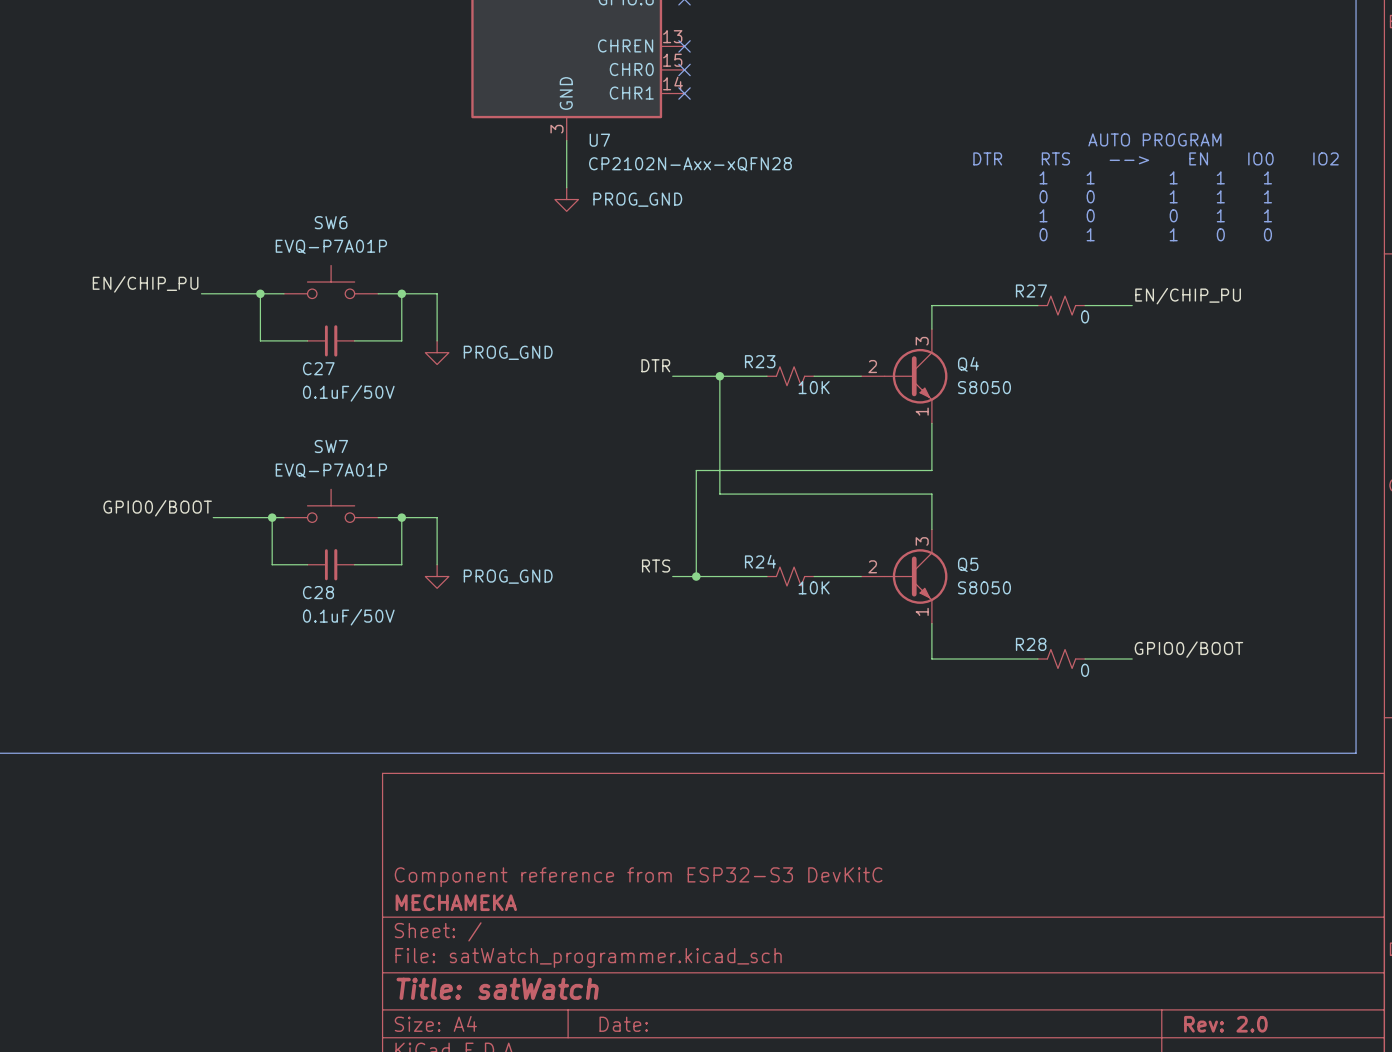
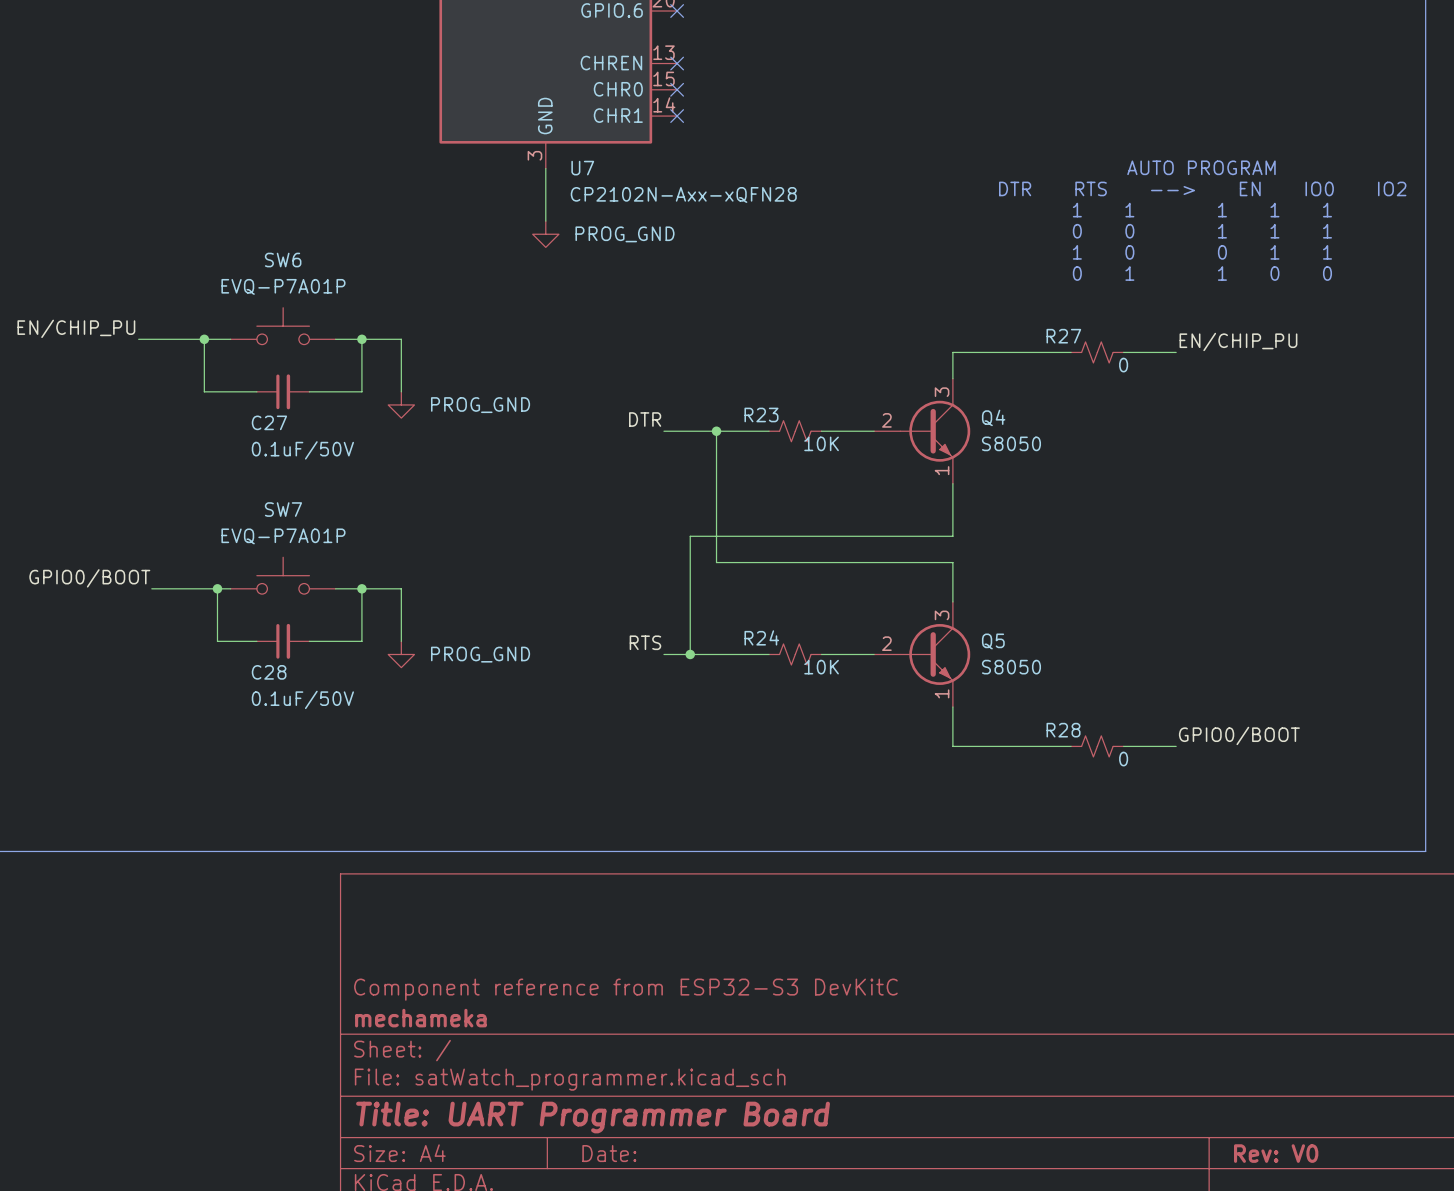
title block: MECHAMEKA (456, 902) -> mechameka (420, 1018)
title block: Title: satWatch (497, 988) -> Title: UART Programmer Board (593, 1117)
title block: Rev: 2.0 (1225, 1024) -> Rev: V0 (1276, 1153)

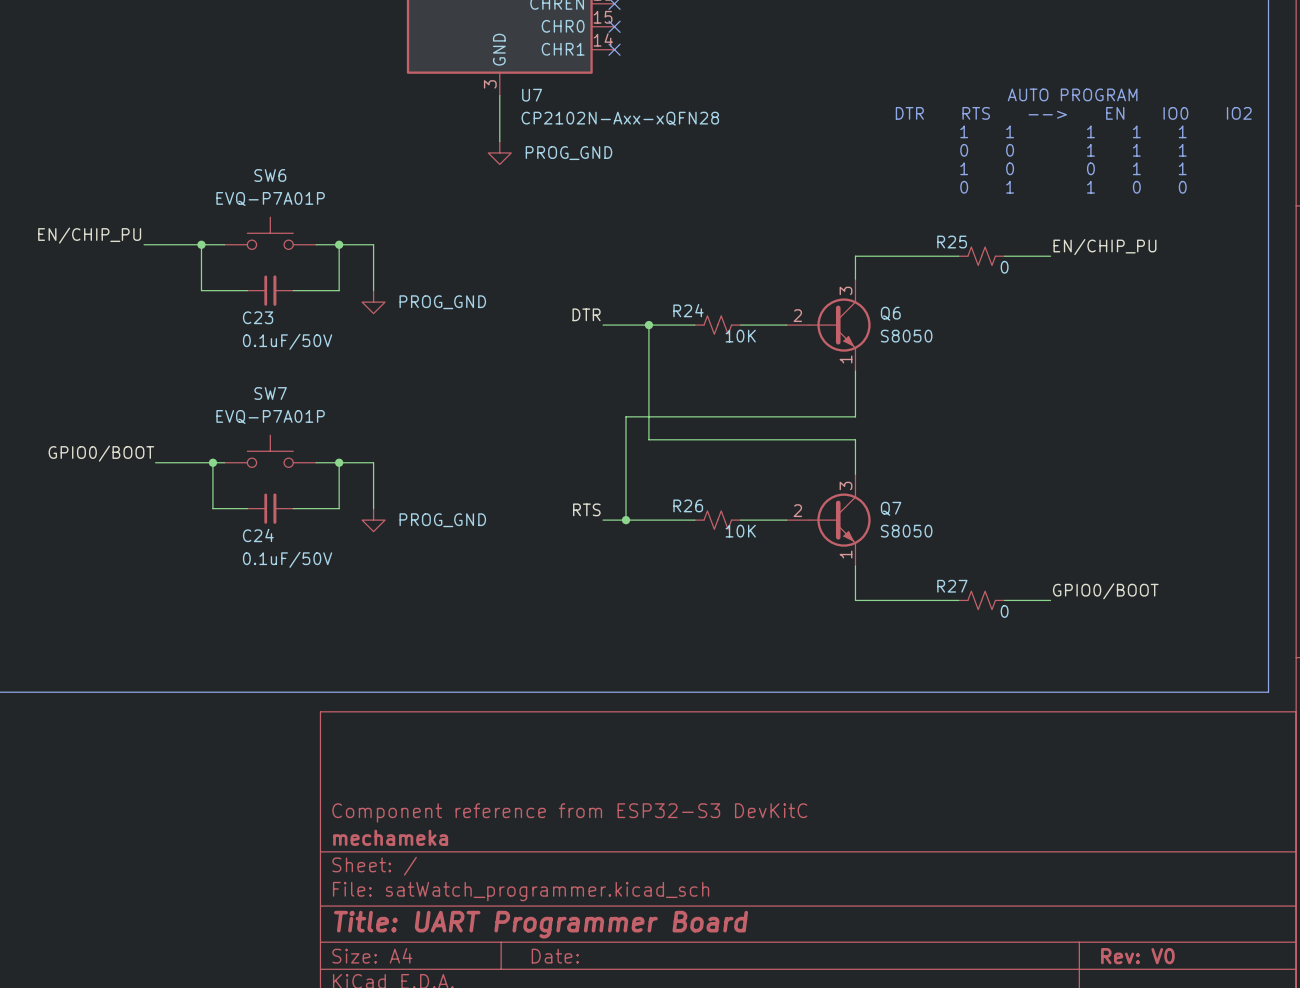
R27 name: R27 (1063, 336) -> R25 (952, 242)
R23 name: R23 (761, 414) -> R24 (688, 310)
Q4 name: Q4 (993, 417) -> Q6 (890, 313)
C27 name: C27 (269, 422) -> C23 (258, 317)
R24 name: R24 (761, 637) -> R26 (688, 505)
Q5 name: Q5 (993, 641) -> Q7 (891, 508)
C28 name: C28 (269, 672) -> C24 (258, 535)
R28 name: R28 (1063, 730) -> R27 (952, 586)

